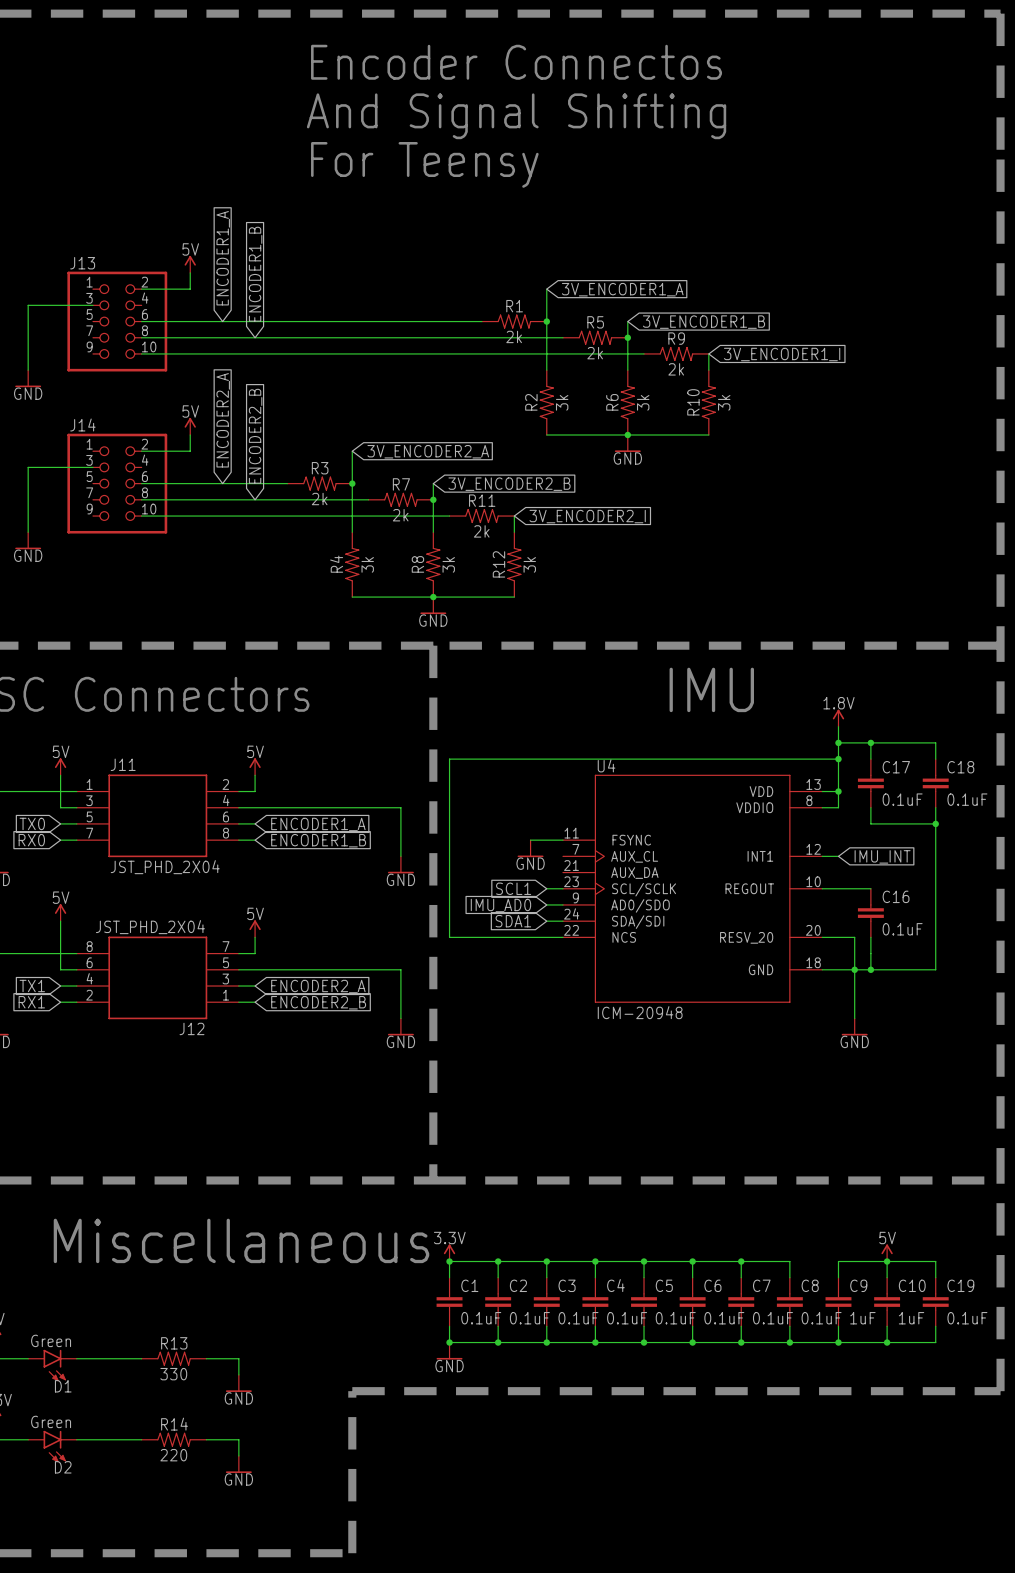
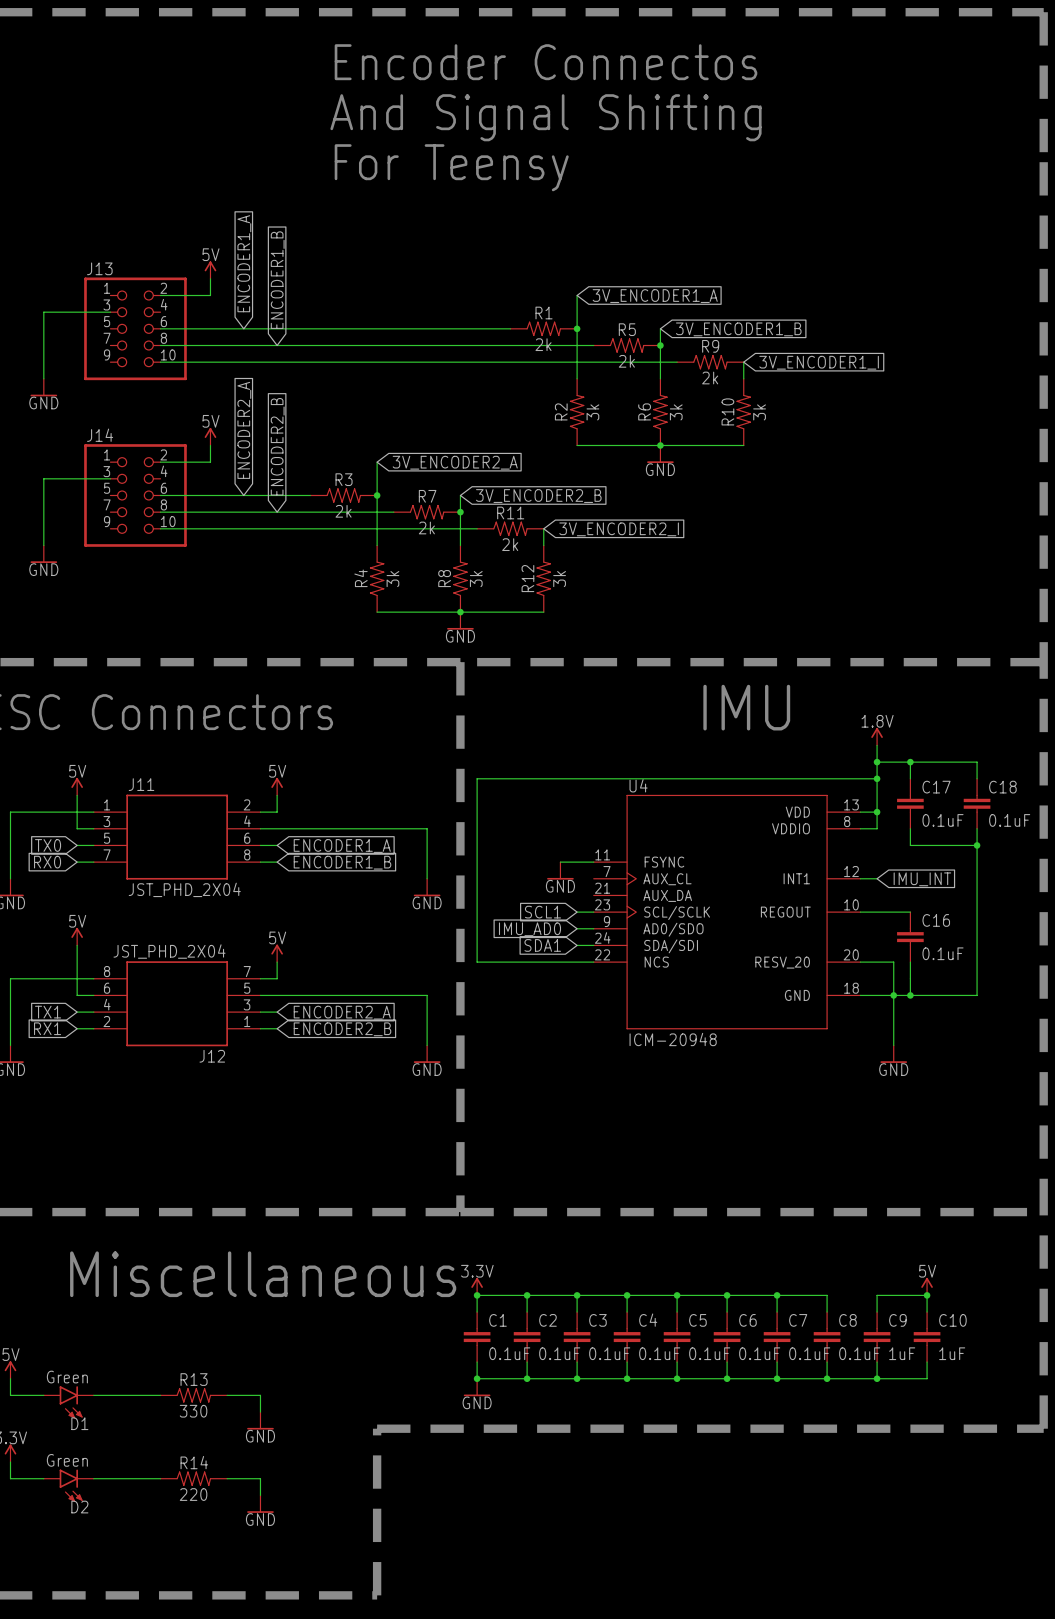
wire: (887, 1261) (935, 1261) (935, 1277) -> none
C19: 0.1uF (935, 1302) -> none
wire: (935, 1326) (935, 1342) (887, 1342) -> none
junction: (887, 1342) -> none

